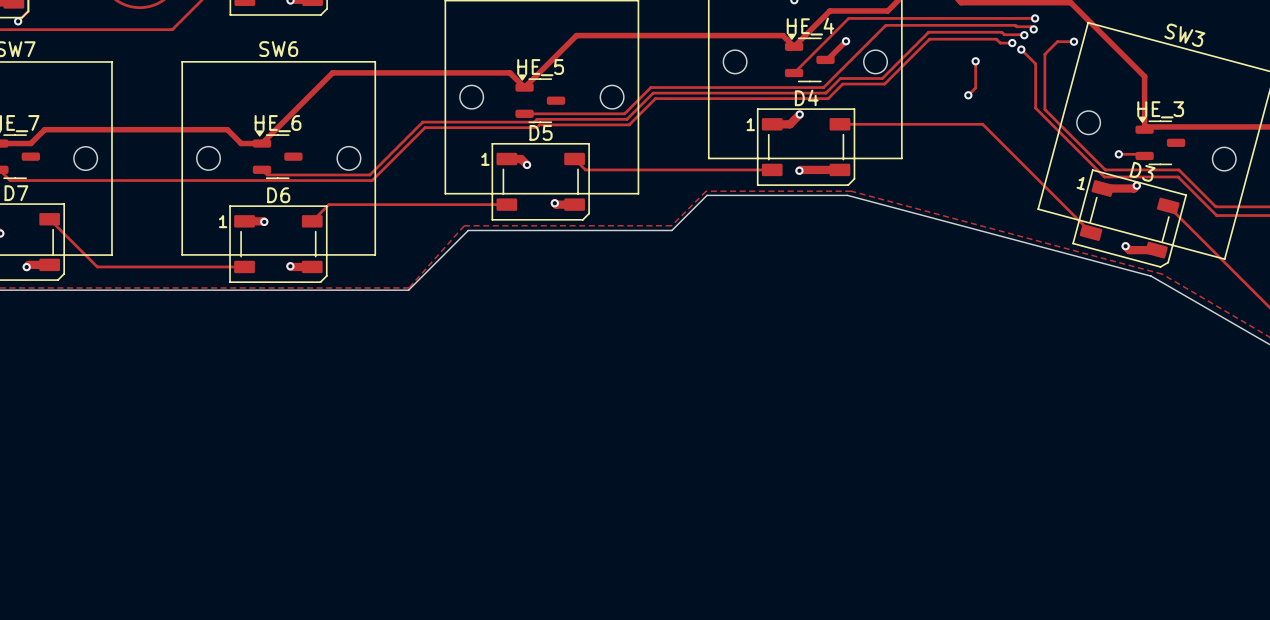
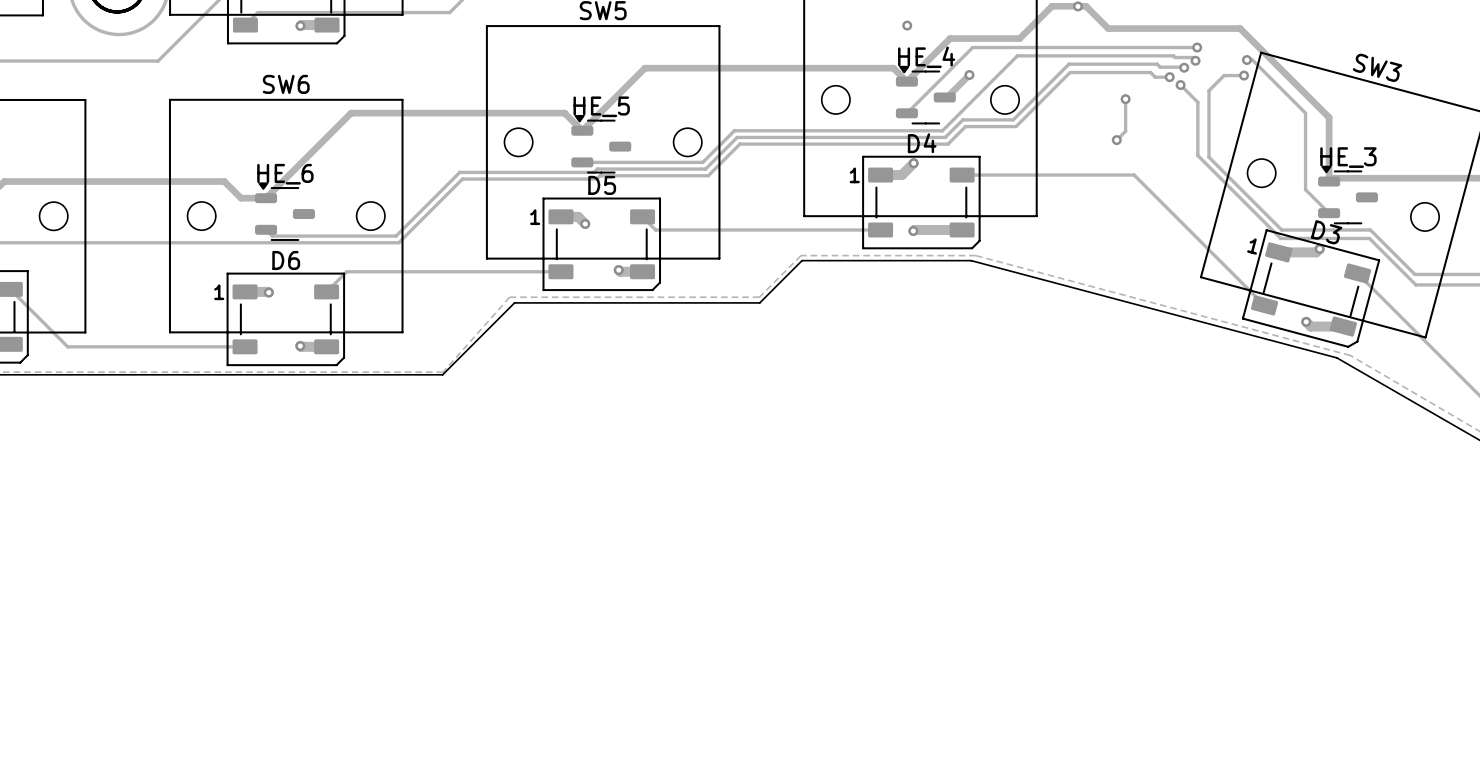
via: none -> (1246, 60)
track: (1118, 154) (1142, 154) -> (1246, 60) (1252, 60) (1305, 113) (1305, 189) (1327, 211)
via: (1118, 154) -> none

